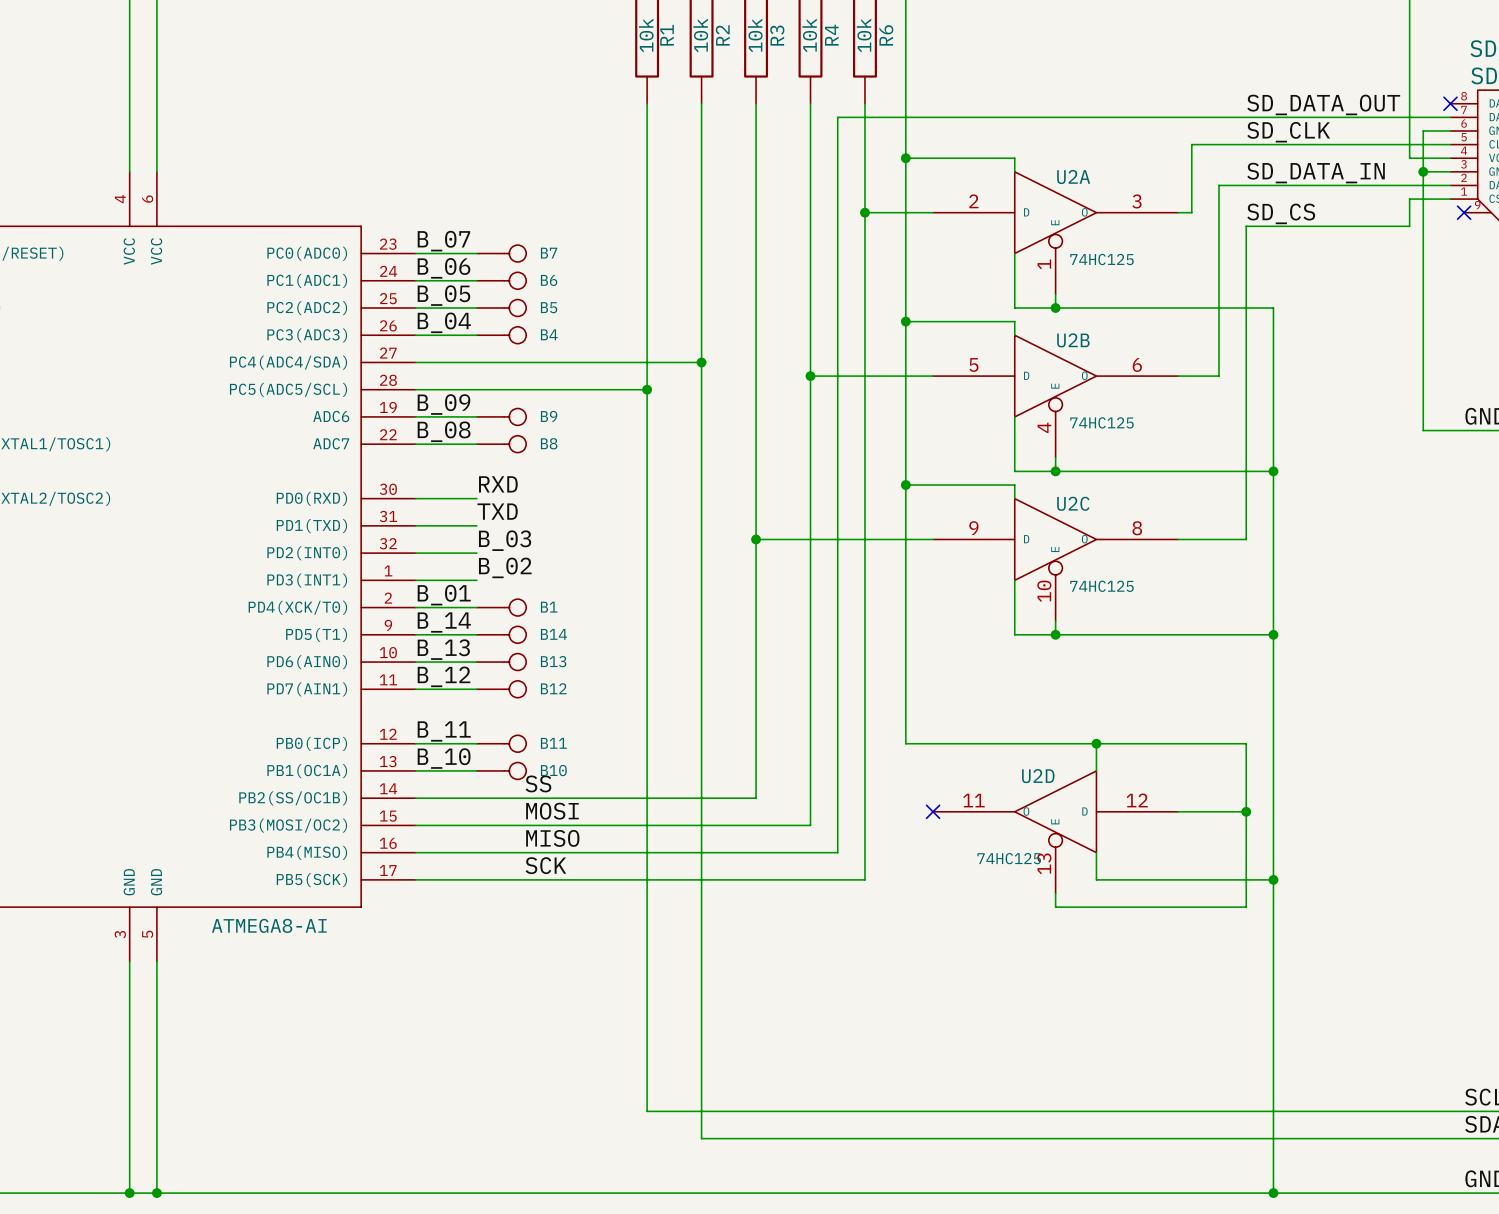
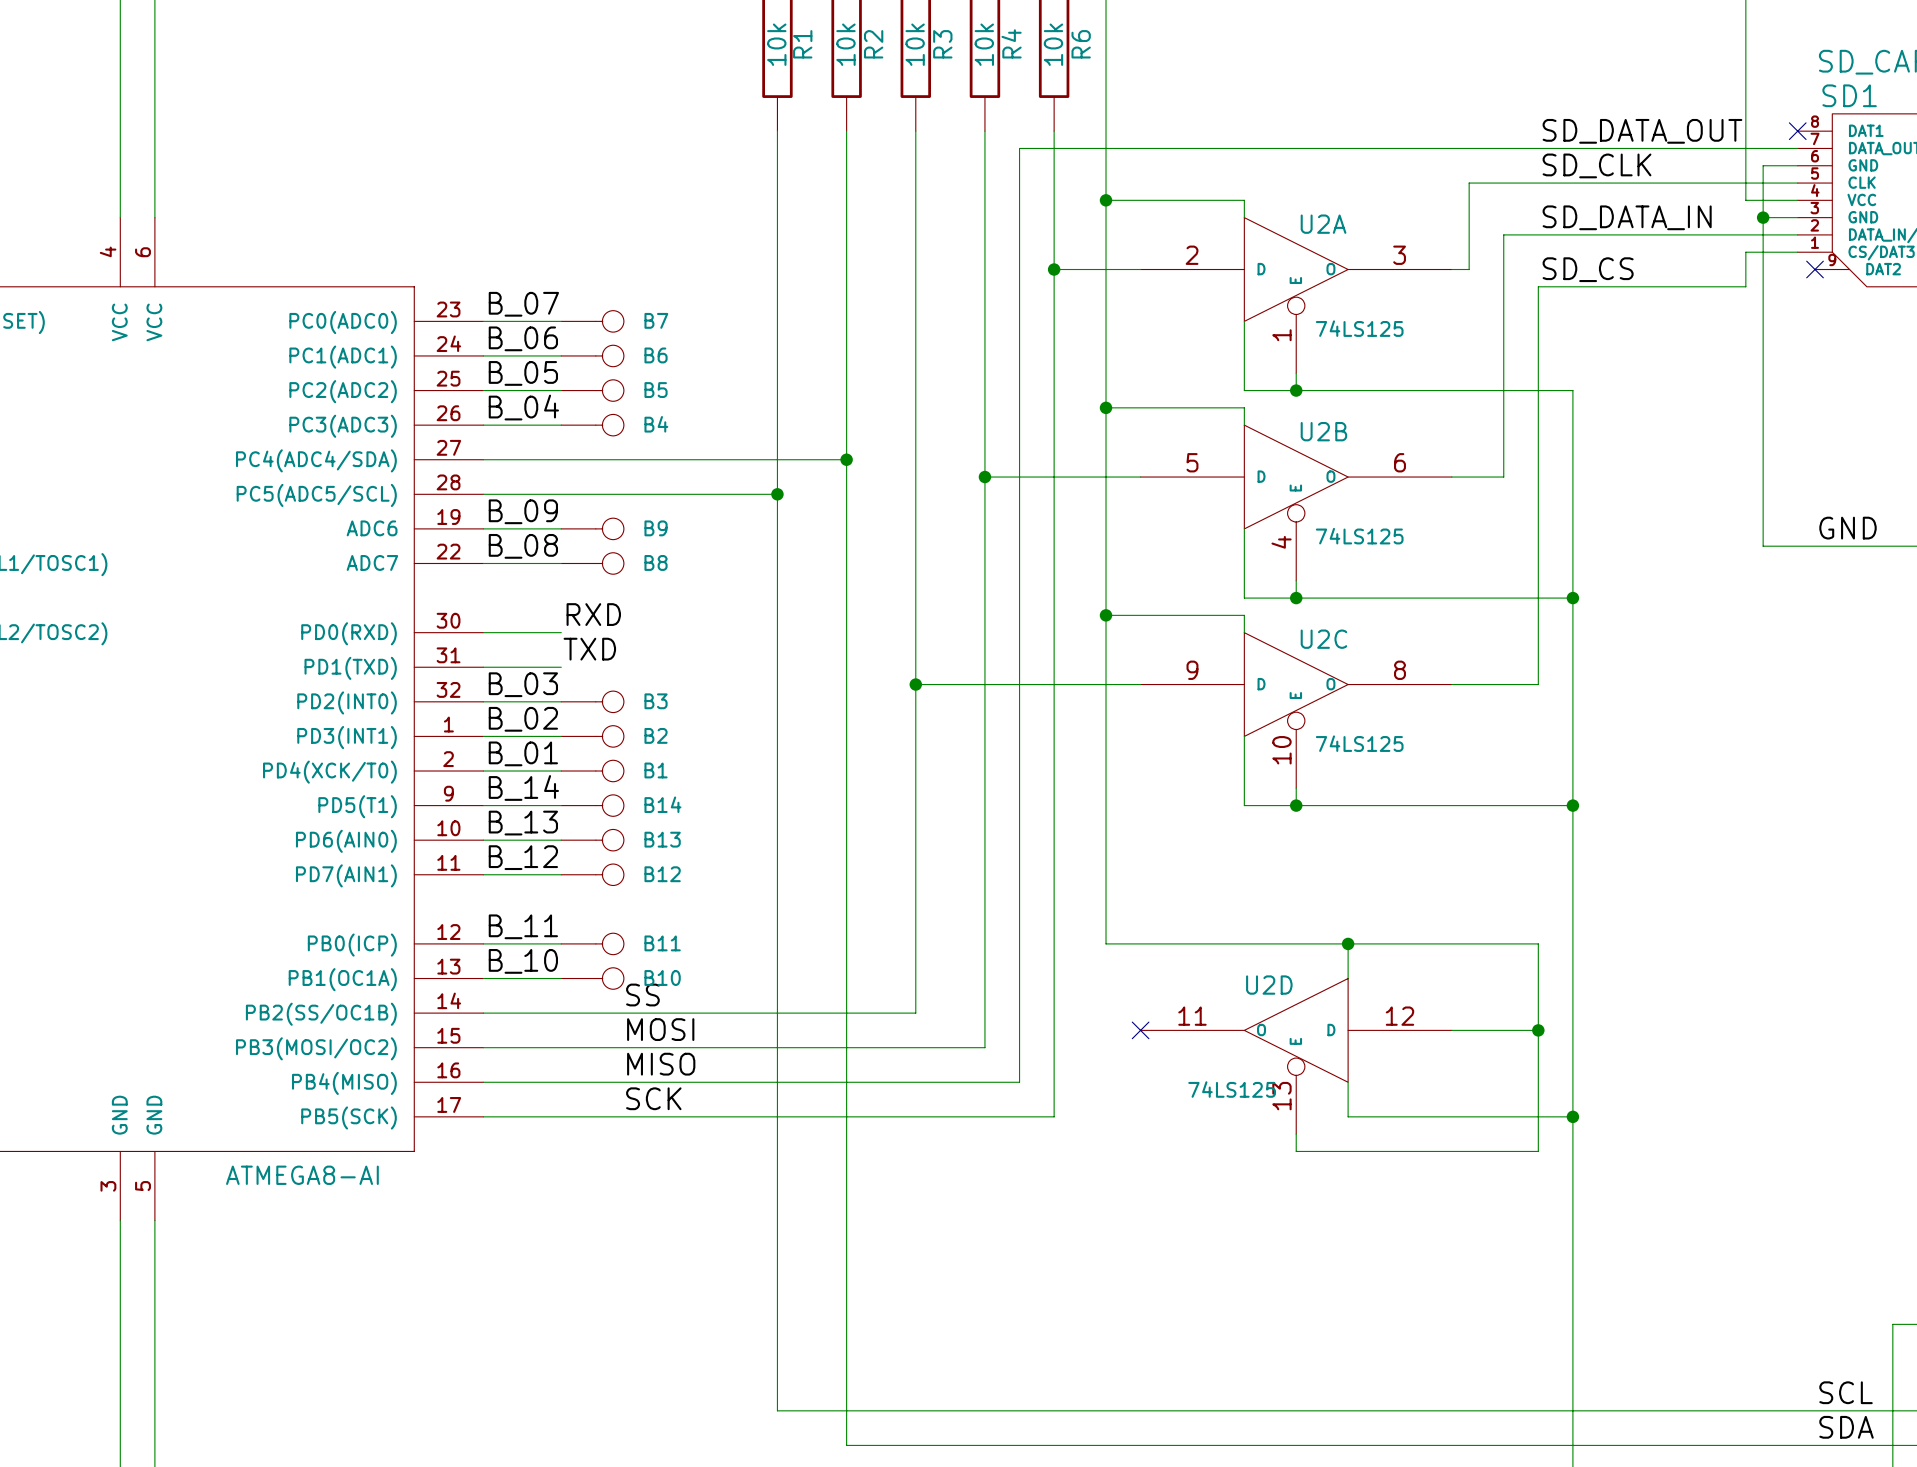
U2A value: 74HC125 (1101, 259) -> 74LS125 (1359, 328)
U2B value: 74HC125 (1101, 422) -> 74LS125 (1359, 536)
label position: B_03 (505, 540) -> B_03 (523, 684)
B3: none -> (592, 701)
label position: B_02 (505, 567) -> B_02 (523, 719)
B2: none -> (592, 736)
U2C value: 74HC125 (1101, 586) -> 74LS125 (1359, 743)
U2D value: 74HC125 (1009, 858) -> 74LS125 (1232, 1089)

